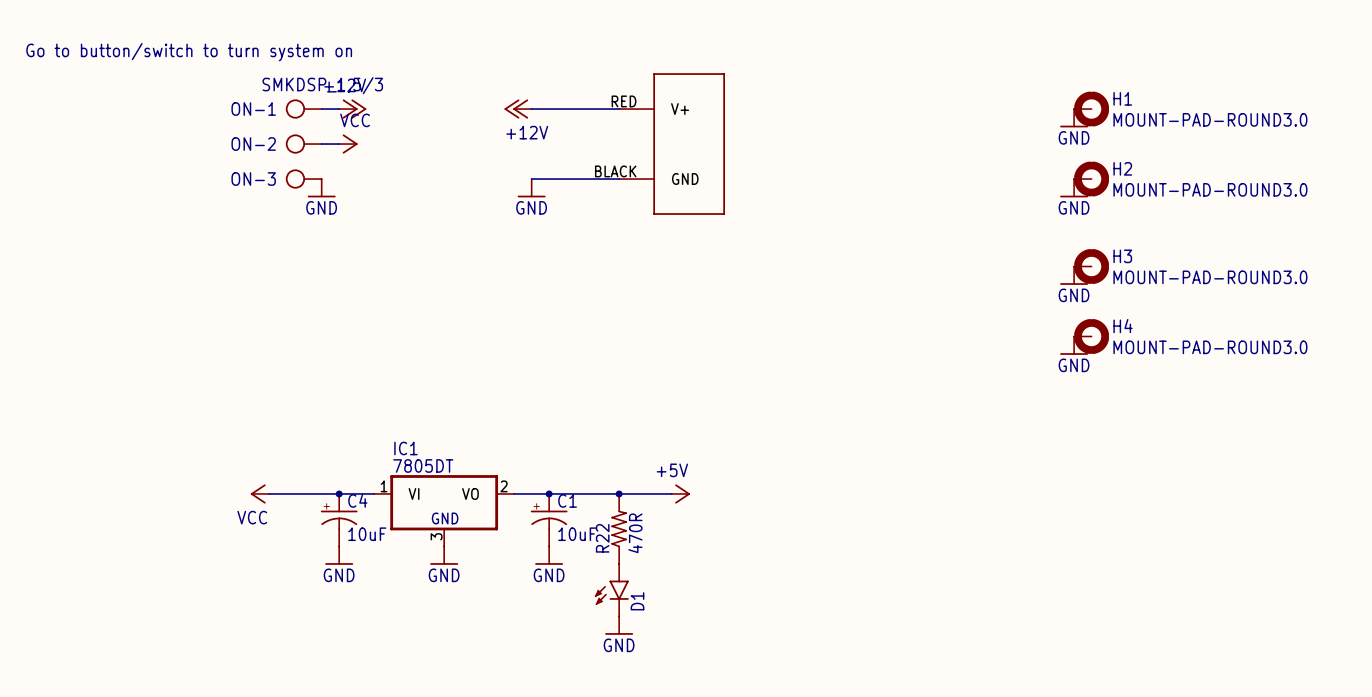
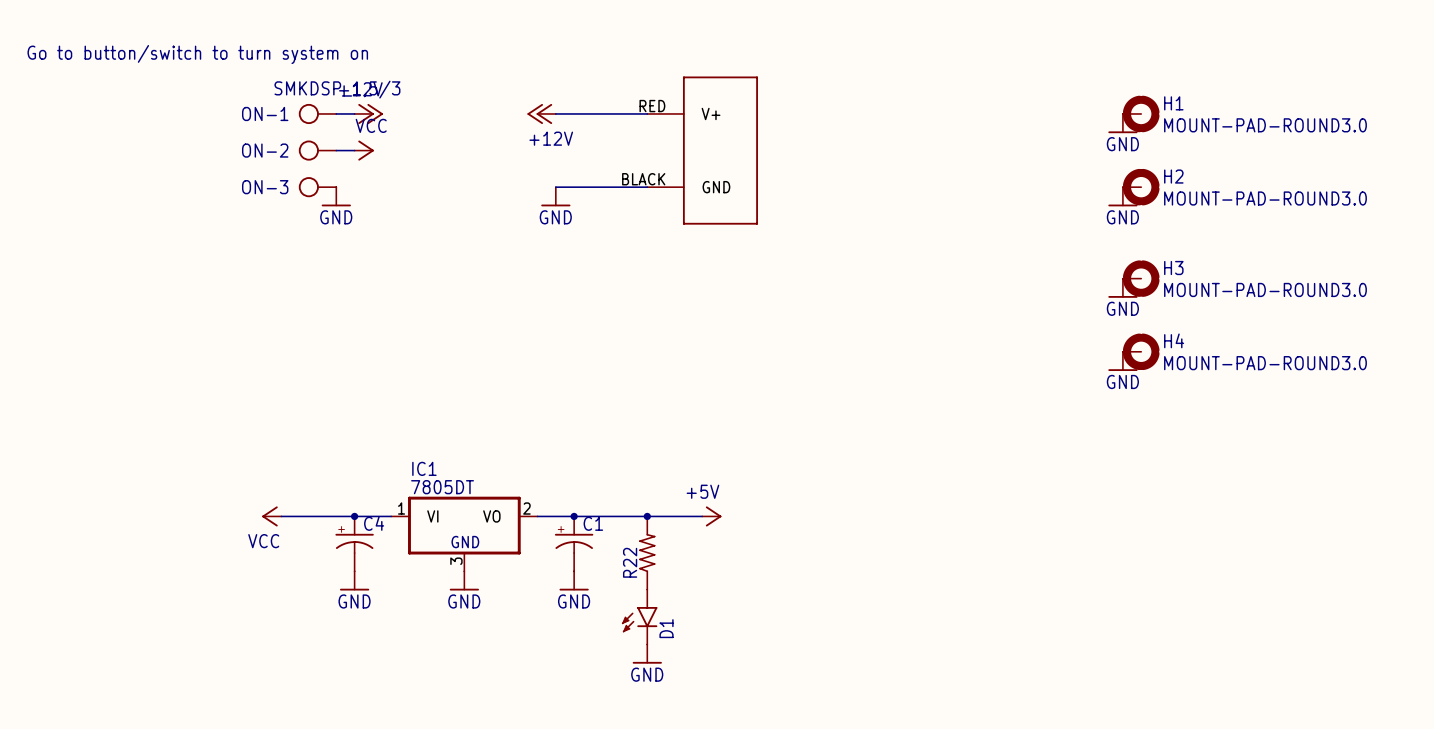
R22 value: 470R (635, 533) -> none
C4 value: 10uF (367, 534) -> none
C1 value: 10uF (577, 534) -> none

